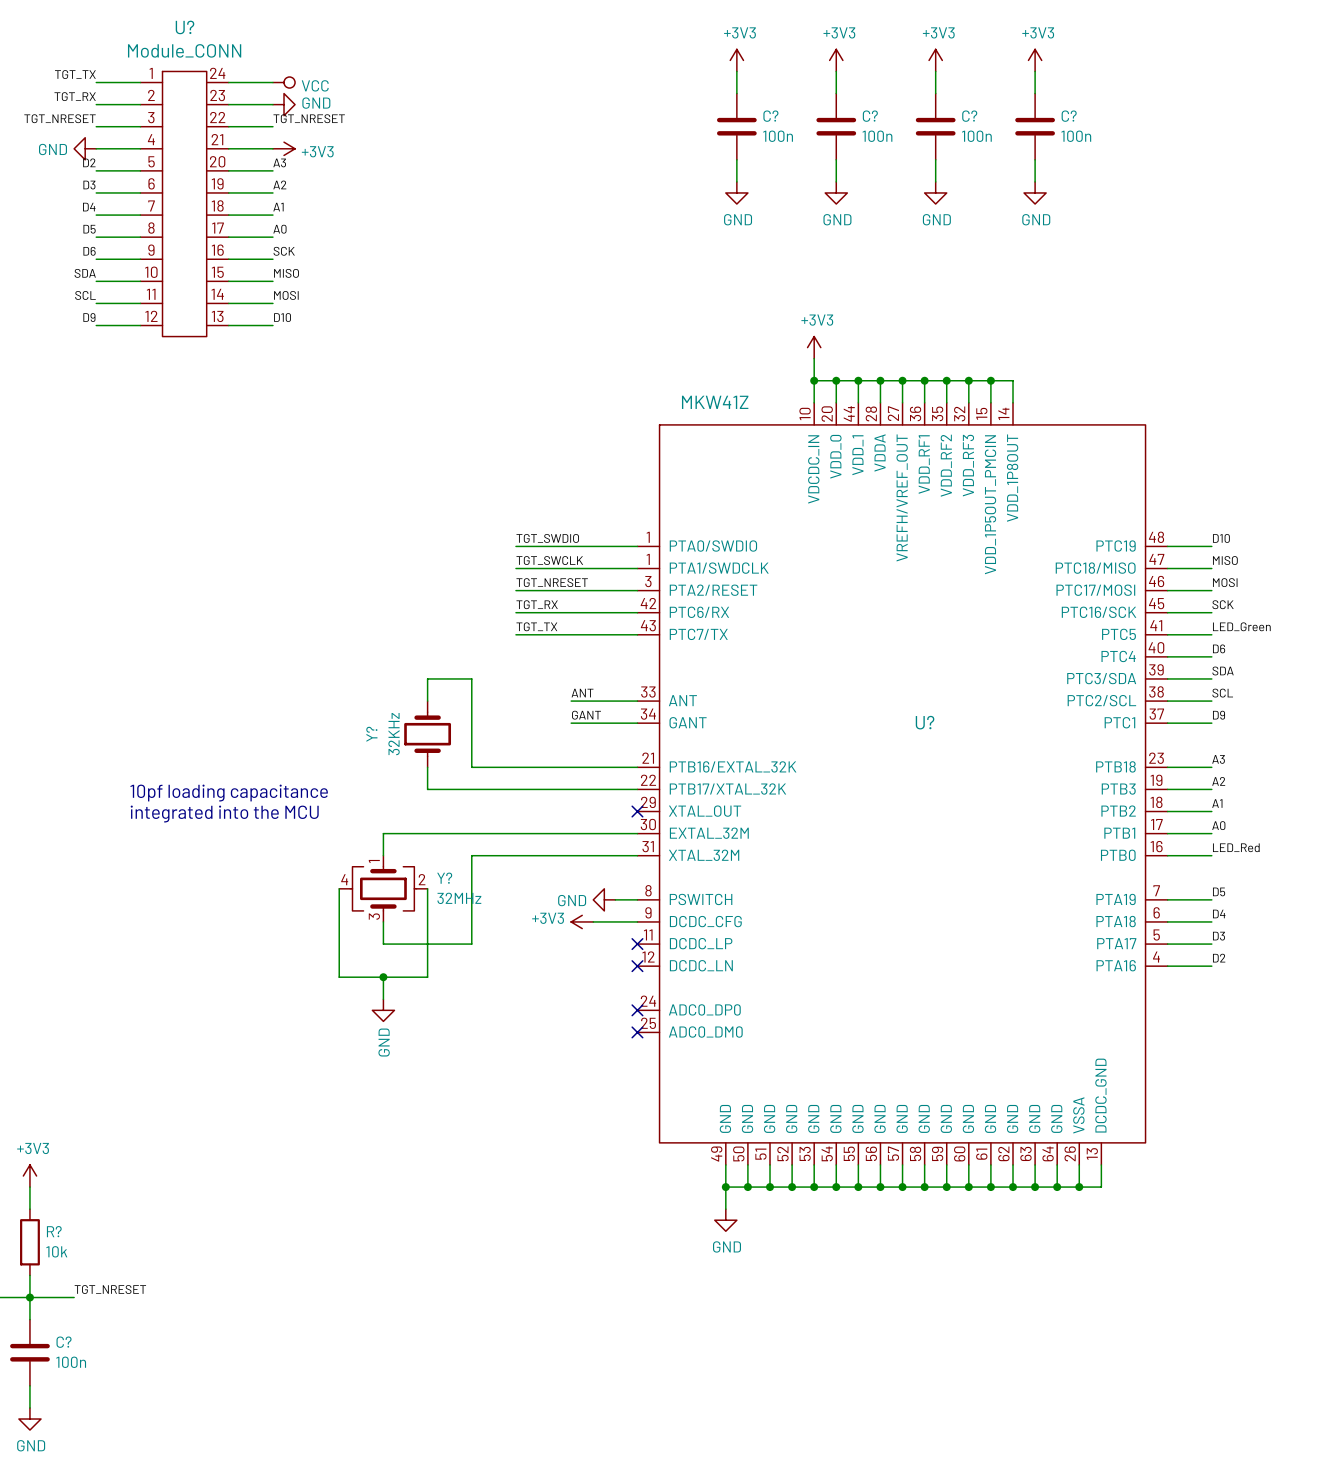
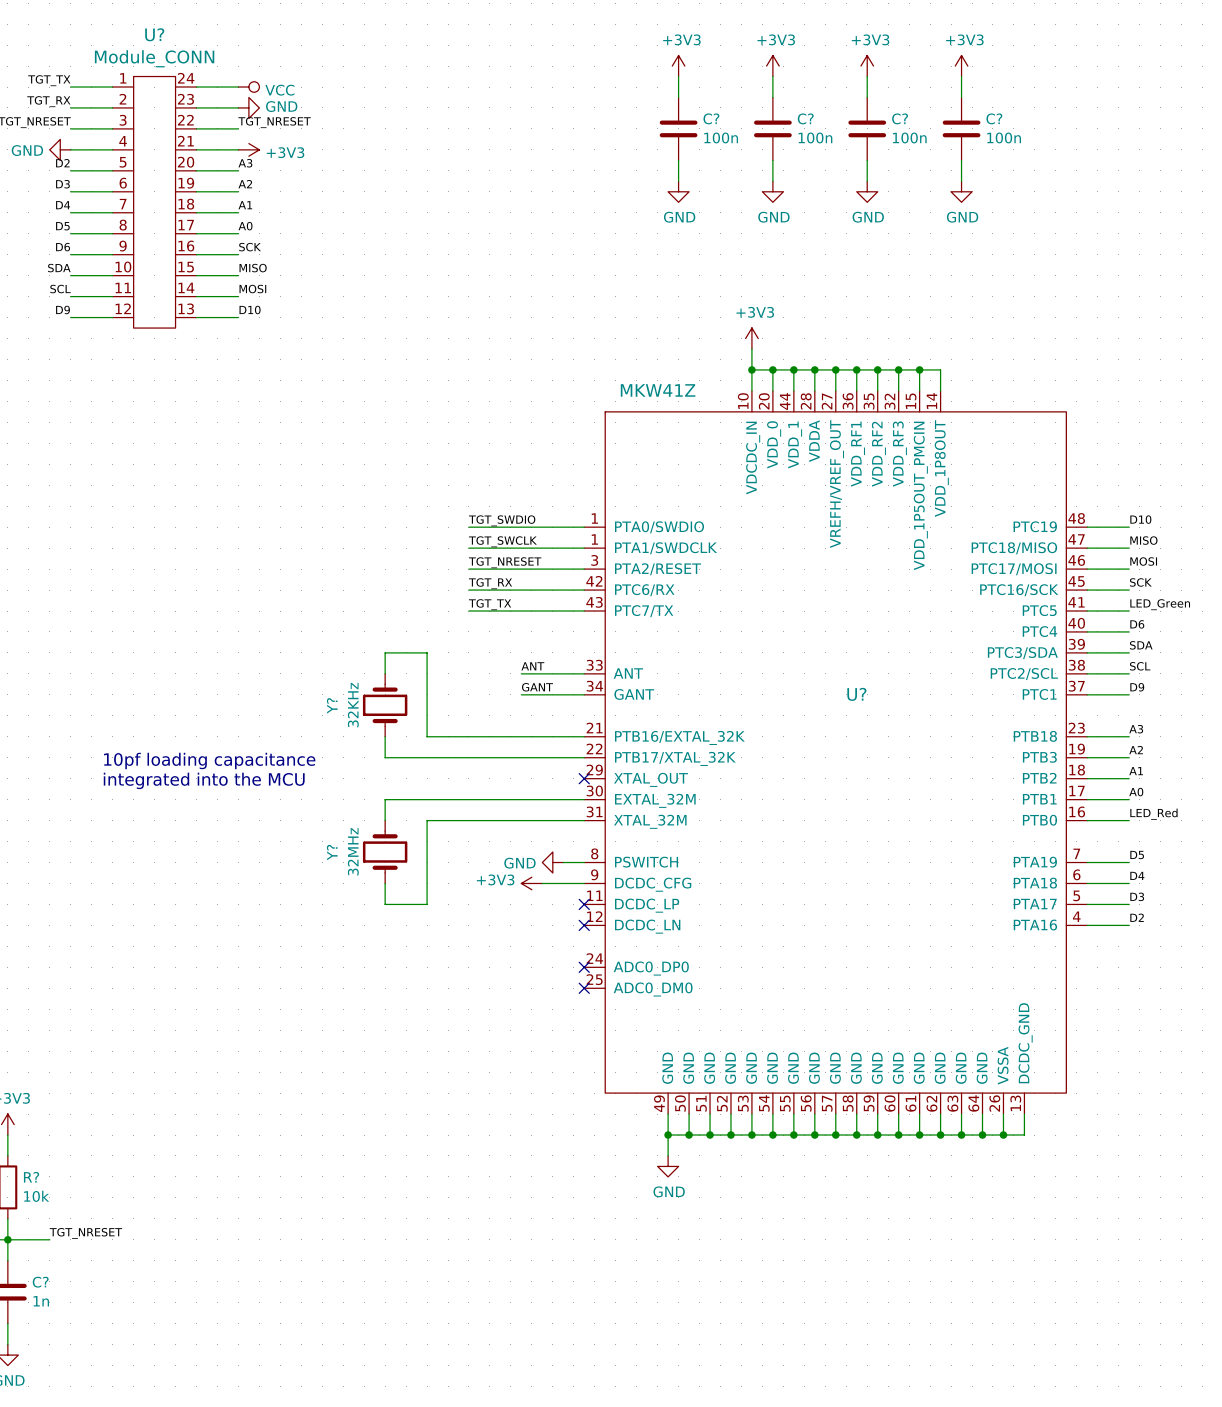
wire: (427, 833) (383, 833) (383, 855) -> (385, 799) (385, 820)
wire: (339, 888) (339, 977) (427, 977) (427, 944) (383, 944) (383, 921) -> none
Y?: 32MHz (383, 888) -> none
Y?: none -> 32MHz (385, 852)
wire: (383, 977) (383, 999) -> none
junction: (383, 977) -> none
power symbol: GND (383, 1010) -> none
C? value: 100n (71, 1362) -> 1n (41, 1301)

